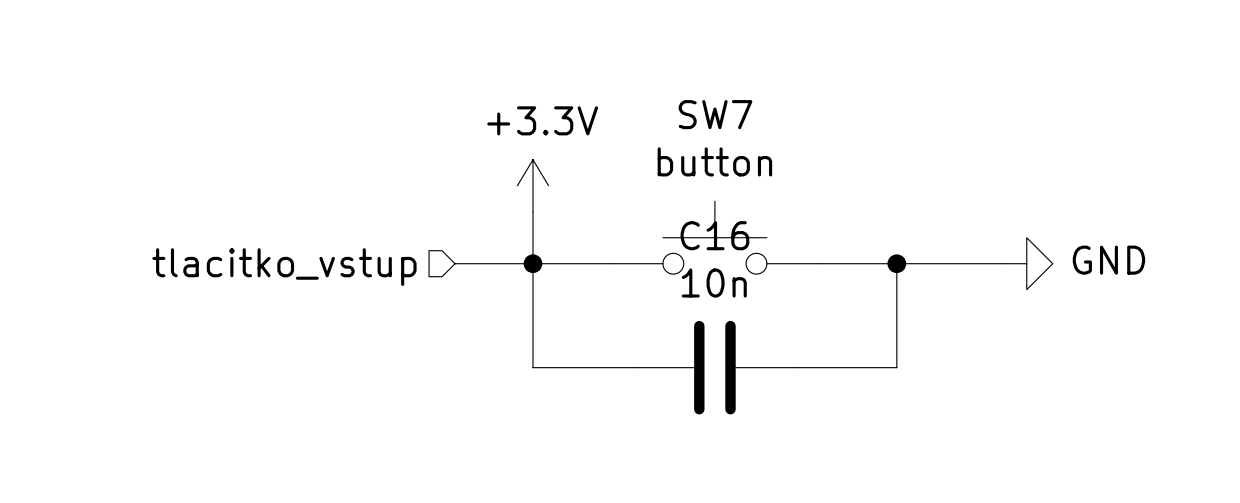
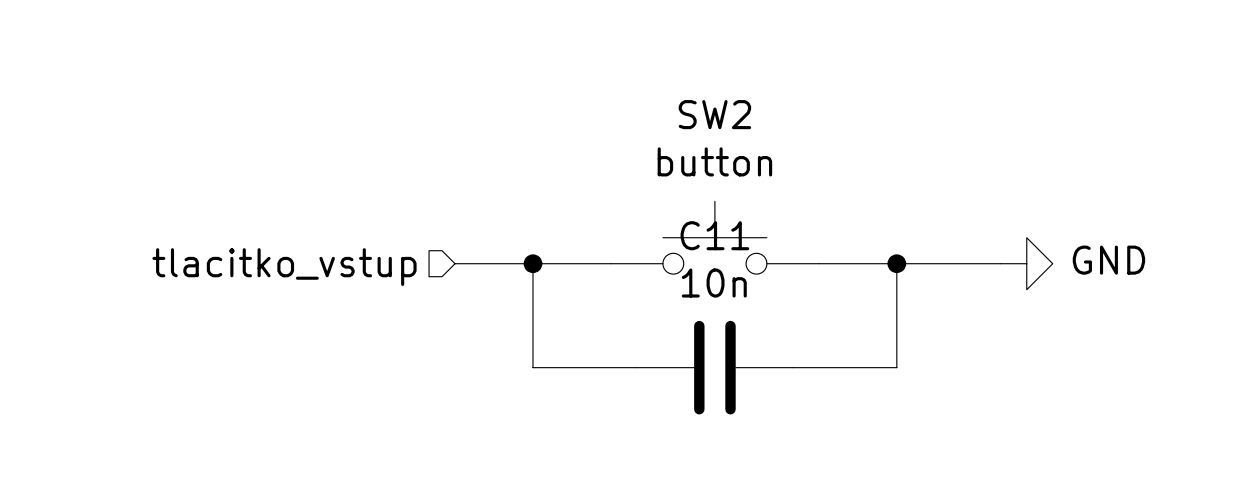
SW7 name: SW7 (715, 114) -> SW2 (714, 114)
power symbol: +3.3V (533, 185) -> none
wire: (533, 211) (533, 263) -> none
C16 name: C16 (714, 235) -> C11 (714, 235)

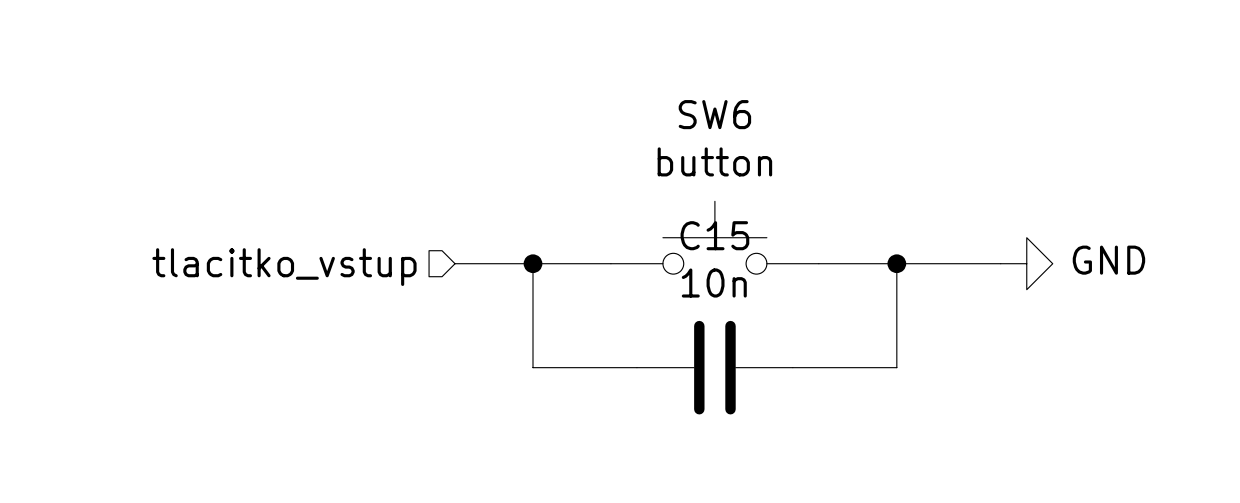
SW2 name: SW2 (714, 114) -> SW6 (714, 114)
C11 name: C11 (714, 235) -> C15 (714, 235)

